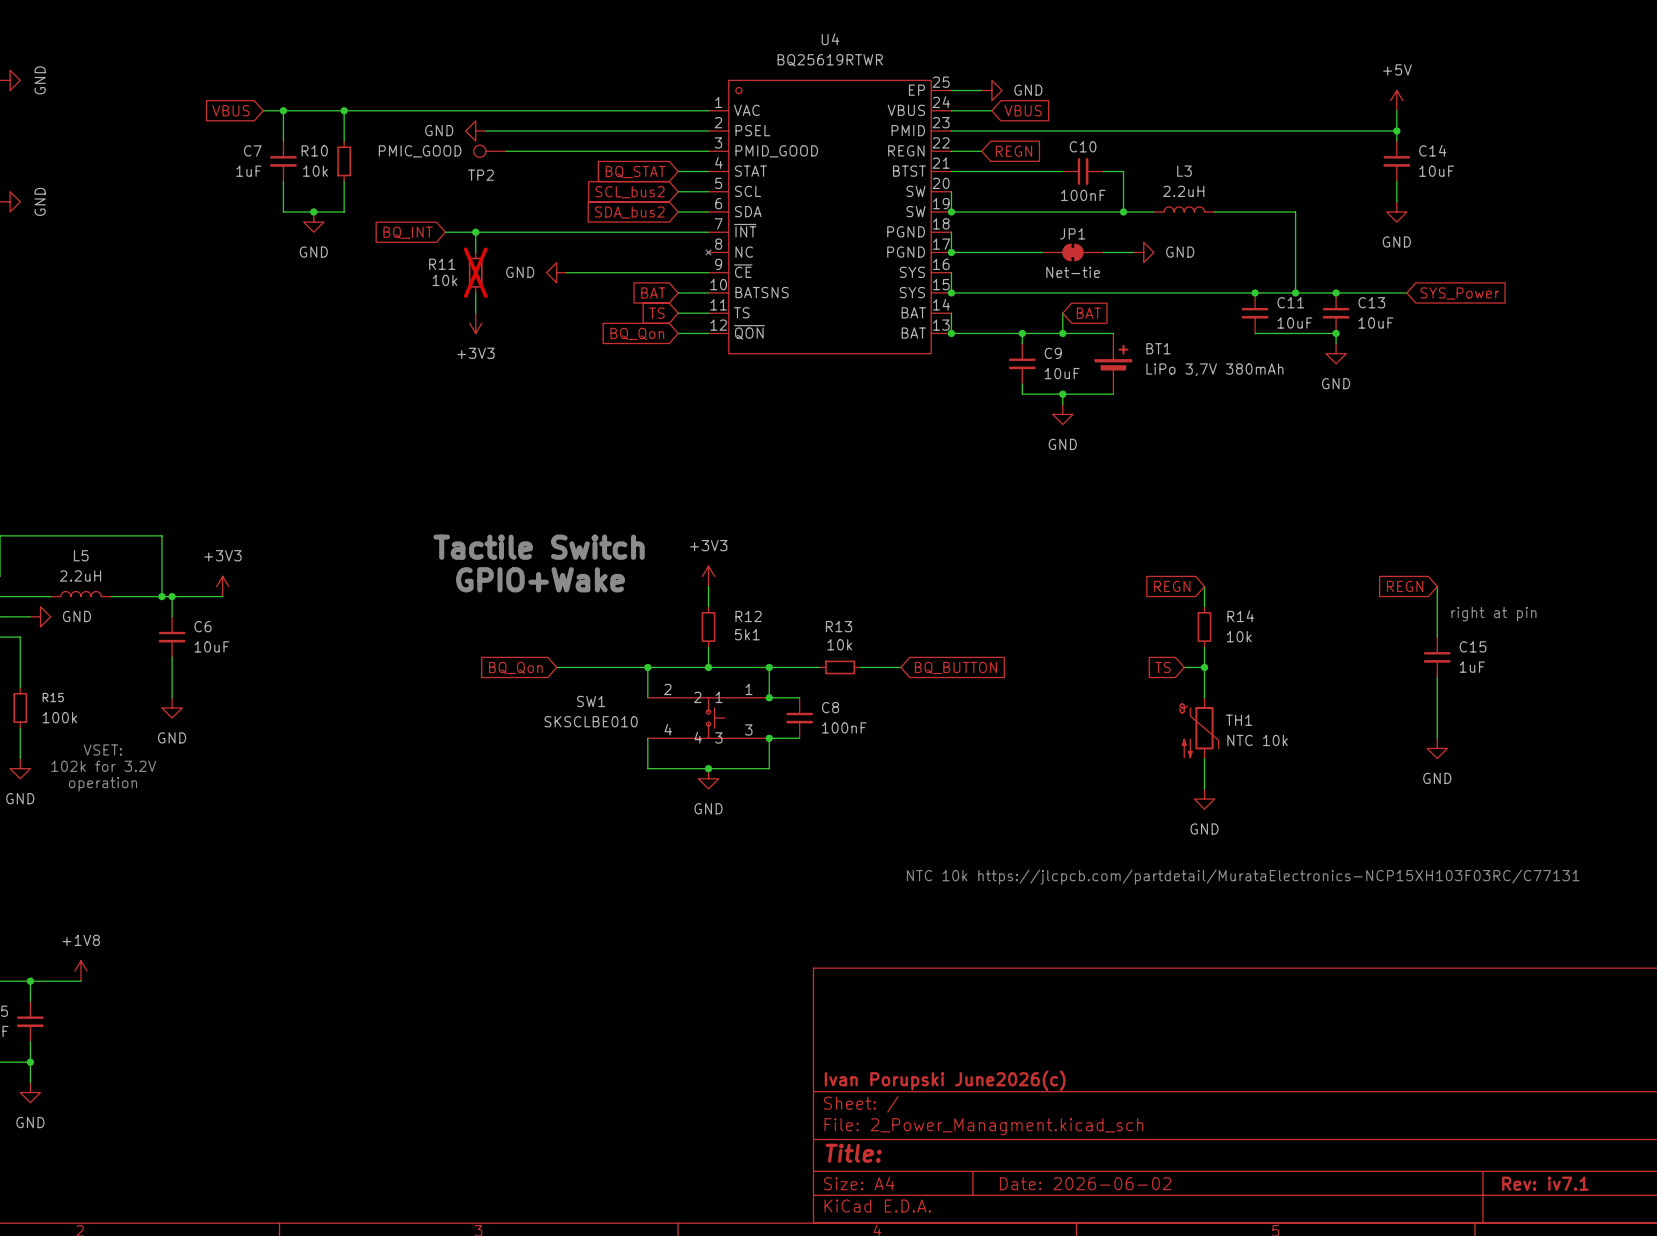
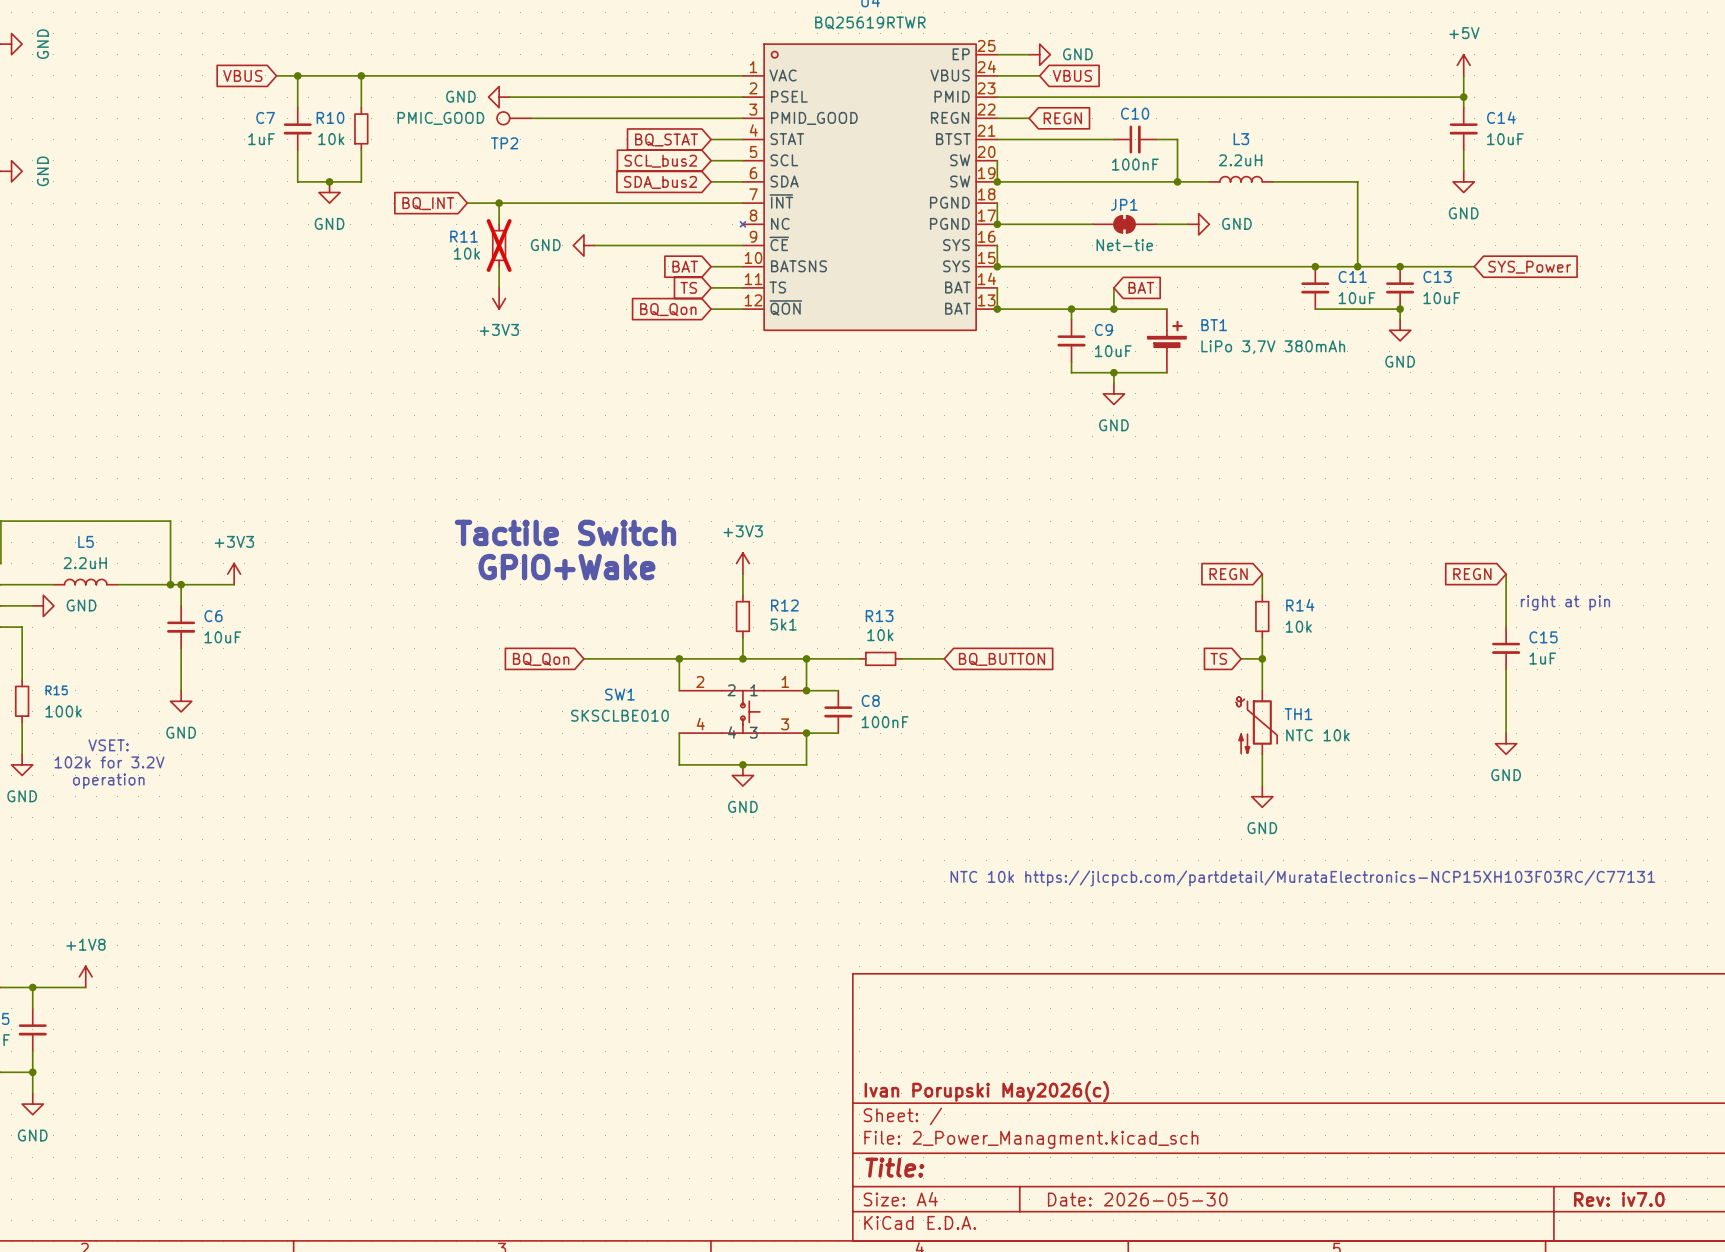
title block: Ivan Porupski June2026(c) (945, 1080) -> Ivan Porupski May2026(c) (986, 1091)
title block: Date: 2026-06-02 (1085, 1183) -> Date: 2026-05-30 (1137, 1199)
title block: Rev: iv7.1 (1545, 1183) -> Rev: iv7.0 (1619, 1199)

